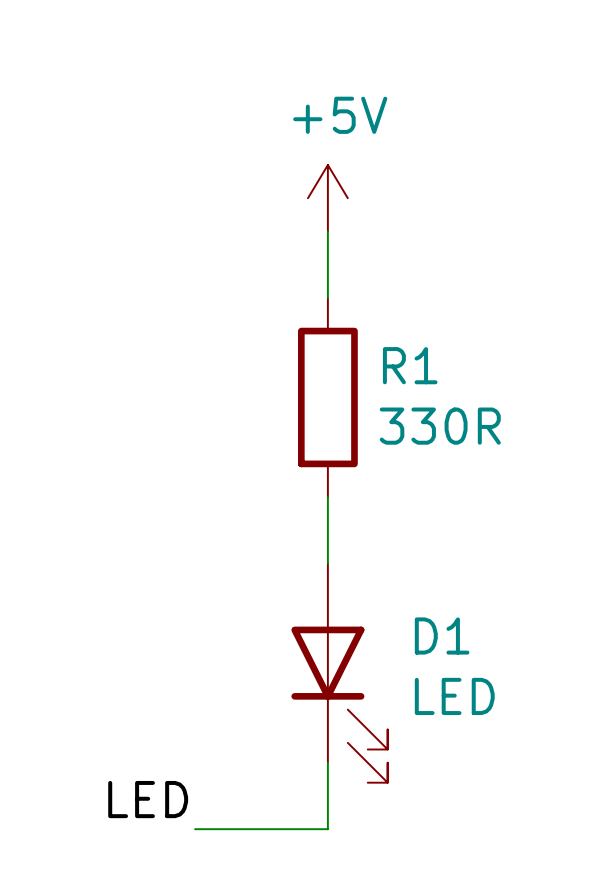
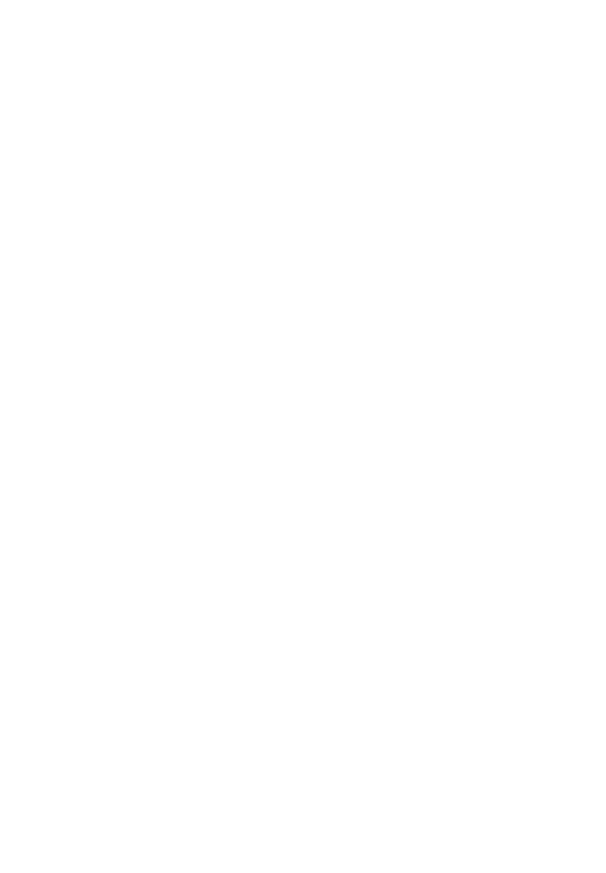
power symbol: +5V (327, 198) -> none
wire: (327, 231) (327, 297) -> none
R1: 330R (327, 397) -> none
wire: (327, 497) (327, 563) -> none
D1: LED (339, 673) -> none
wire: (327, 762) (327, 829) (195, 829) -> none
label: LED (148, 799) -> none

